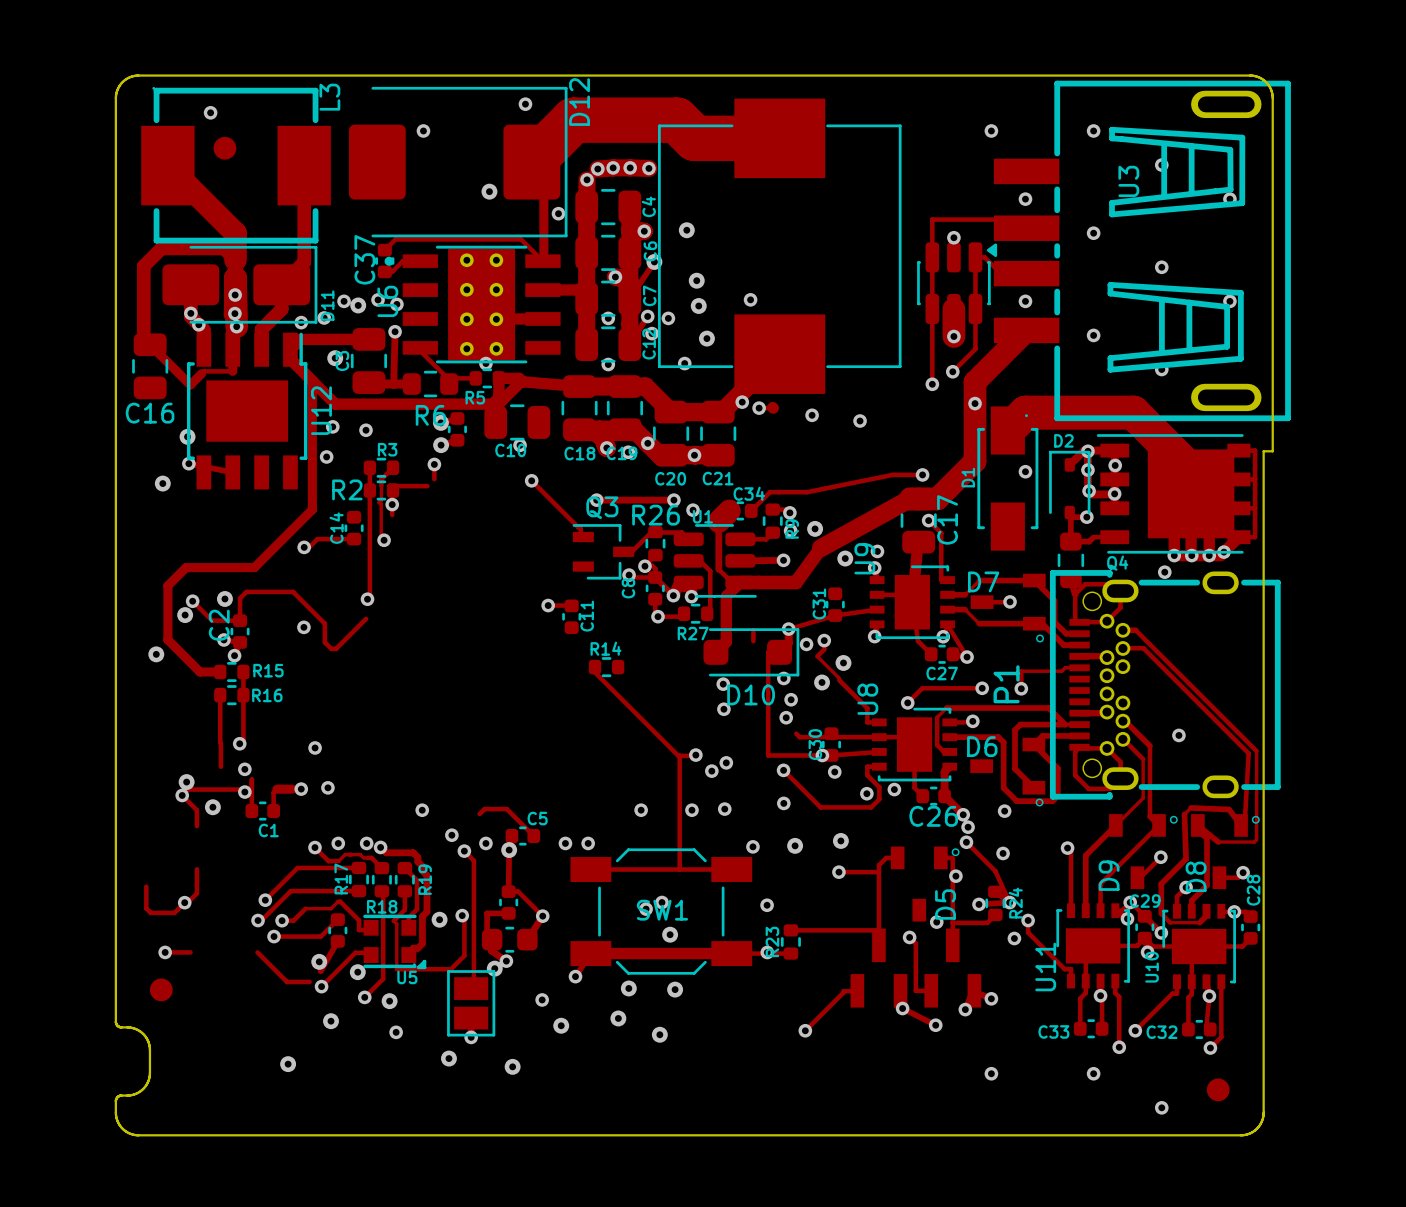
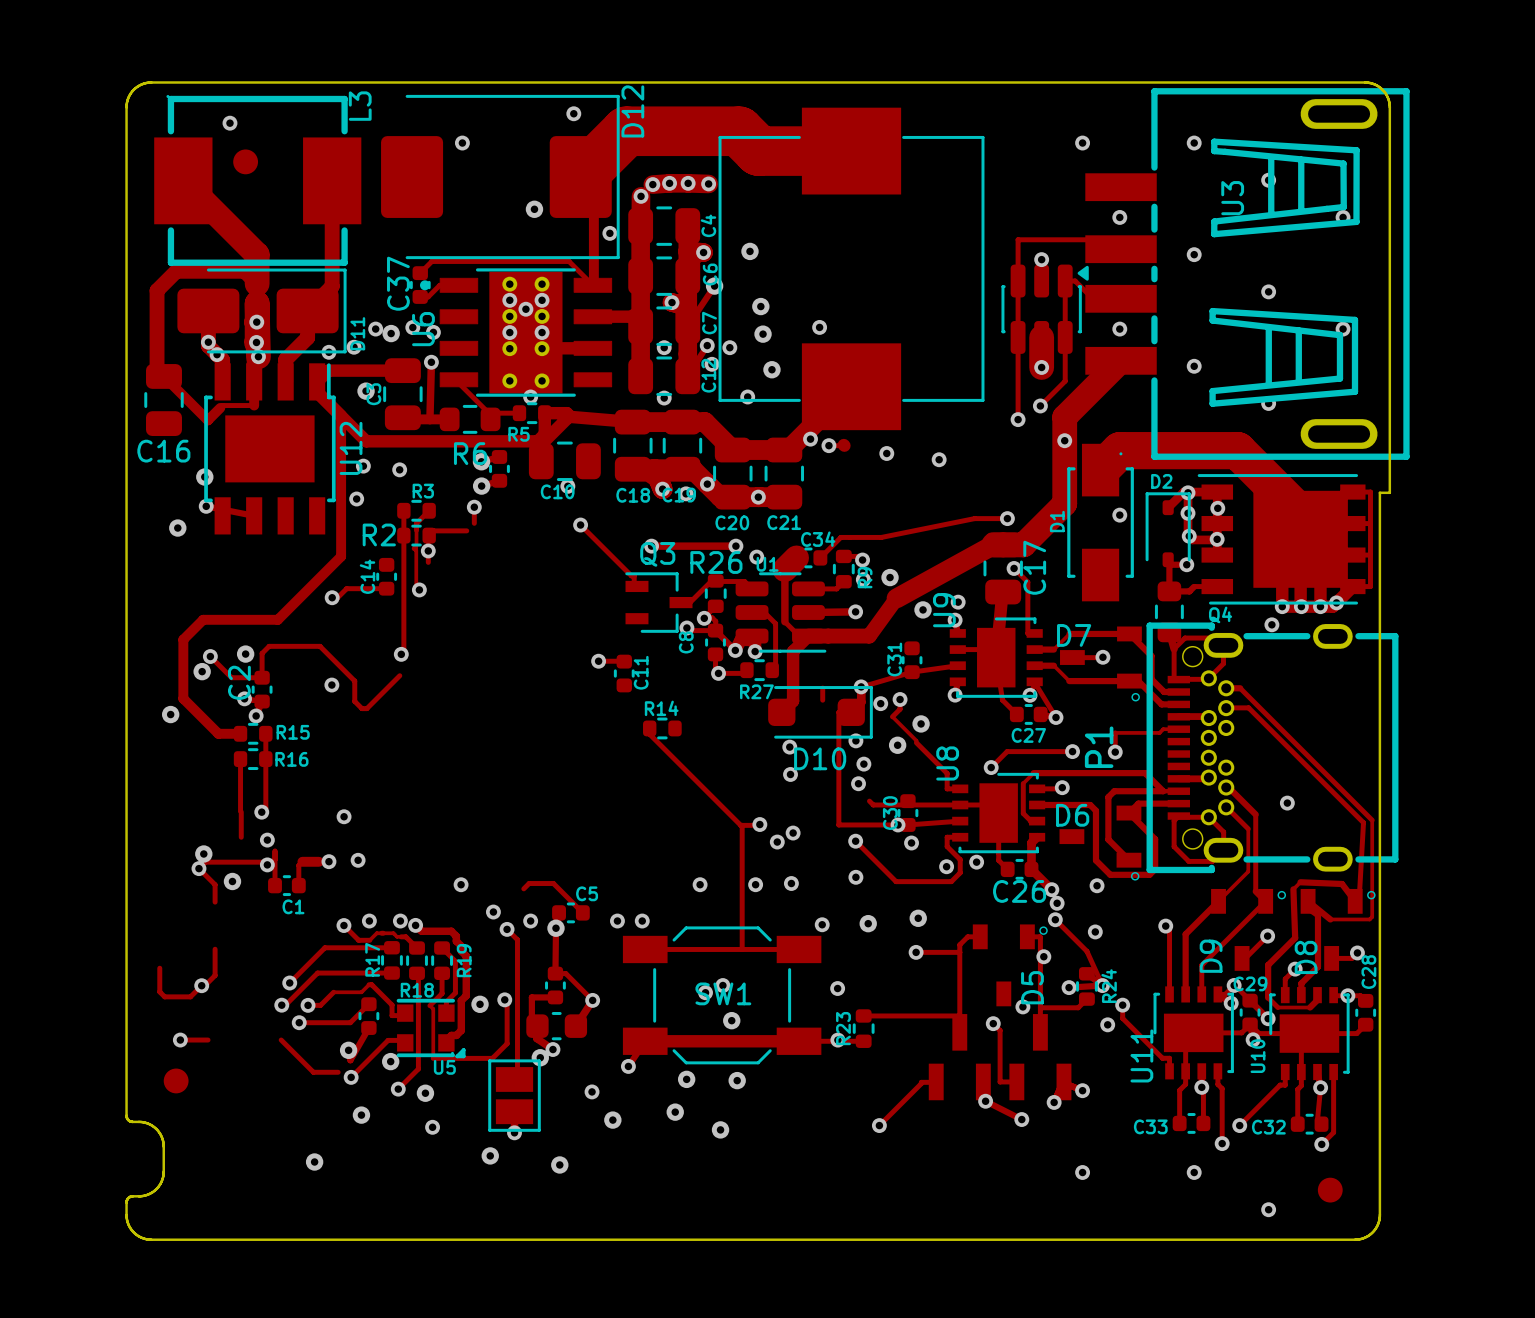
via: none -> (509, 300)
via: none -> (542, 300)
via: none -> (525, 309)
via: none -> (509, 332)
via: none -> (542, 332)

